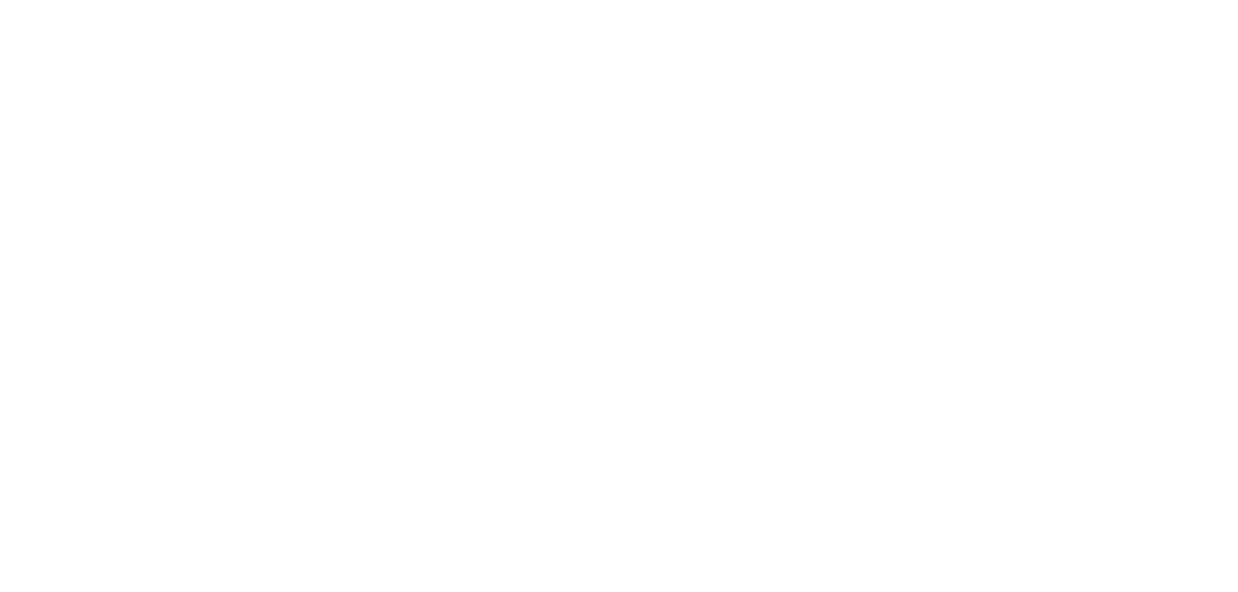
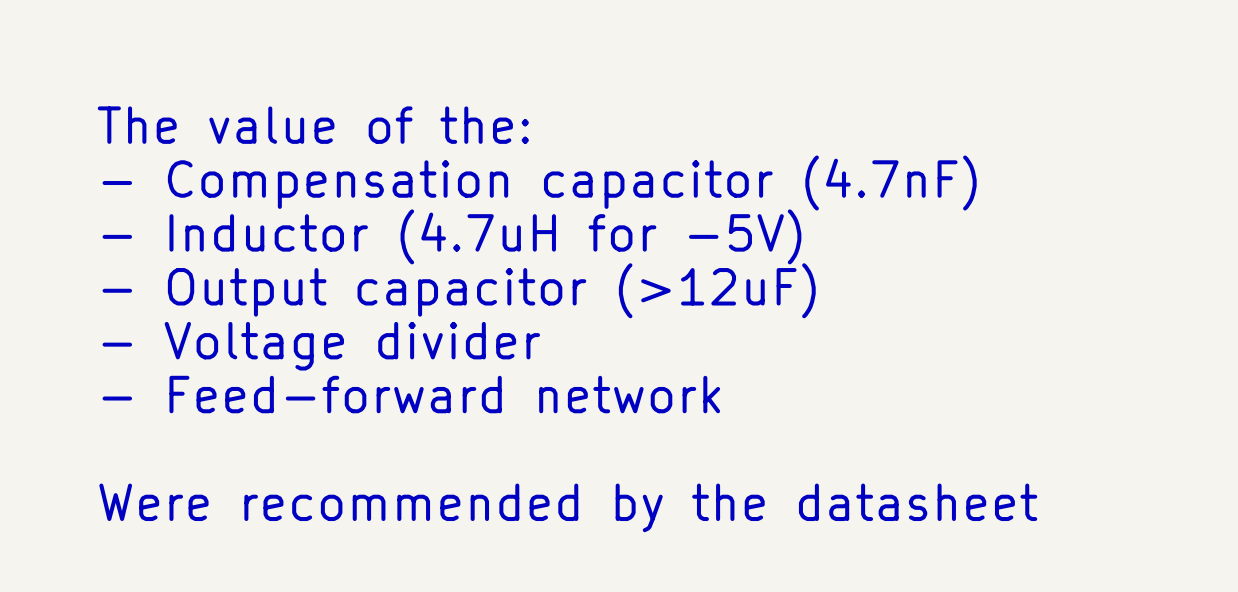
text: none -> The value of the: (313, 125)
text: none -> - Compensation capacitor (4.7nF) (539, 183)
text: none -> - Inductor (4.7uH for -5V) (451, 236)
text: none -> - Output capacitor (>12uF) (459, 290)
text: none -> - Voltage divider (321, 346)
text: none -> - Feed-forward network (411, 394)
text: none -> Were recommended by the datasheet (568, 507)

